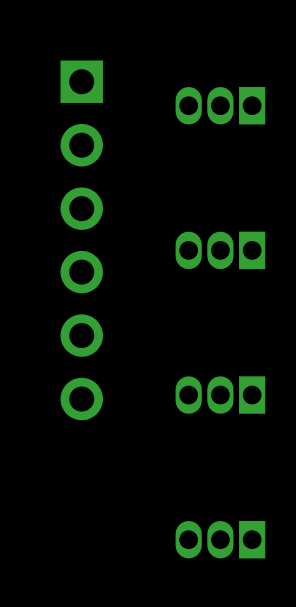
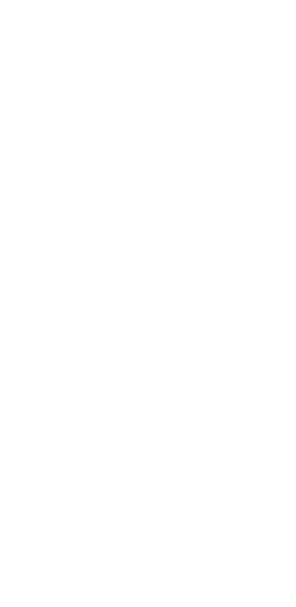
part: (220, 105) -> none
part: (81, 240) -> none
part: (220, 250) -> none
part: (220, 395) -> none
part: (220, 539) -> none

